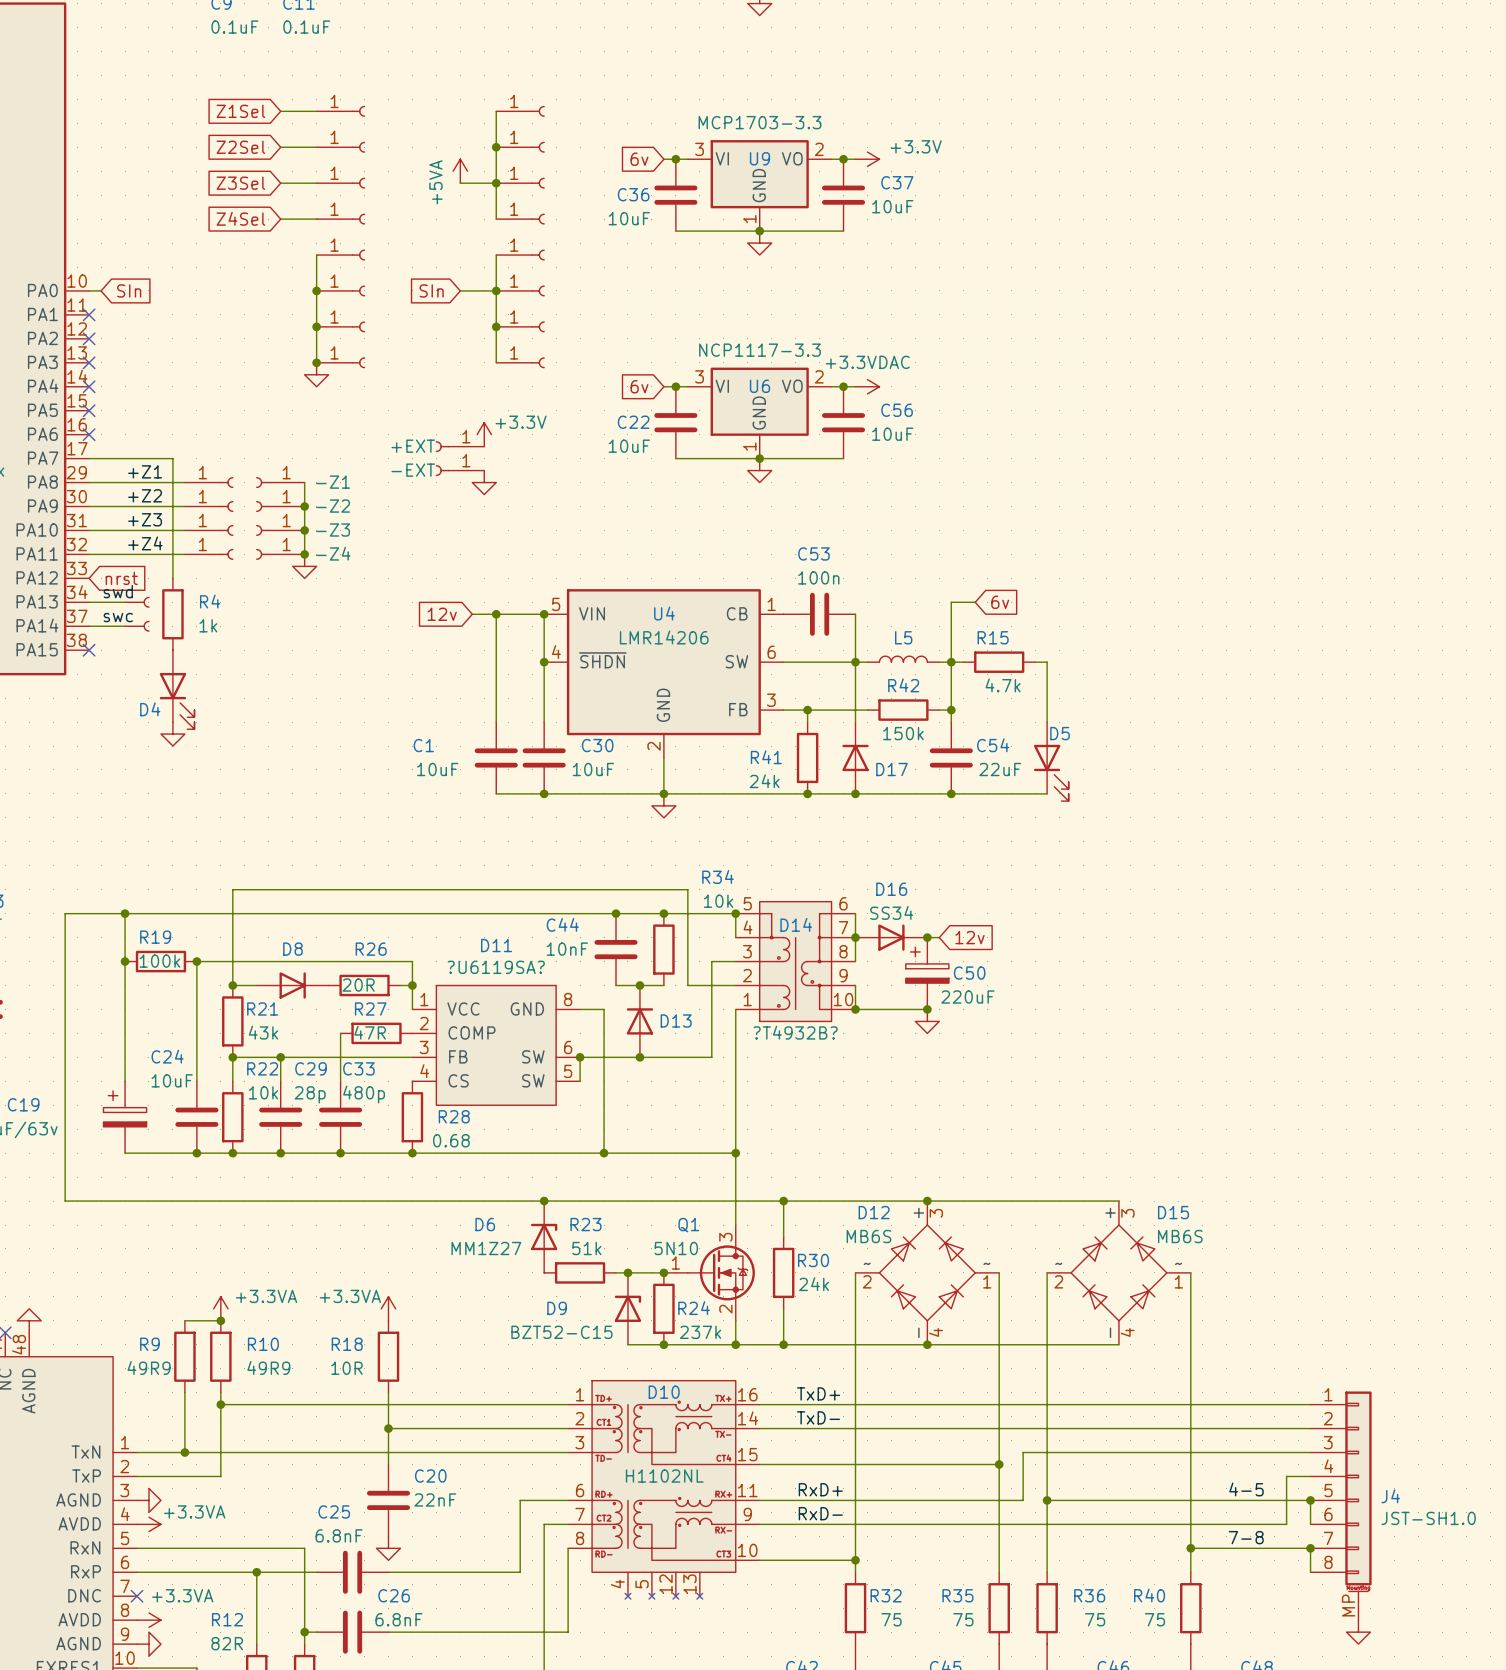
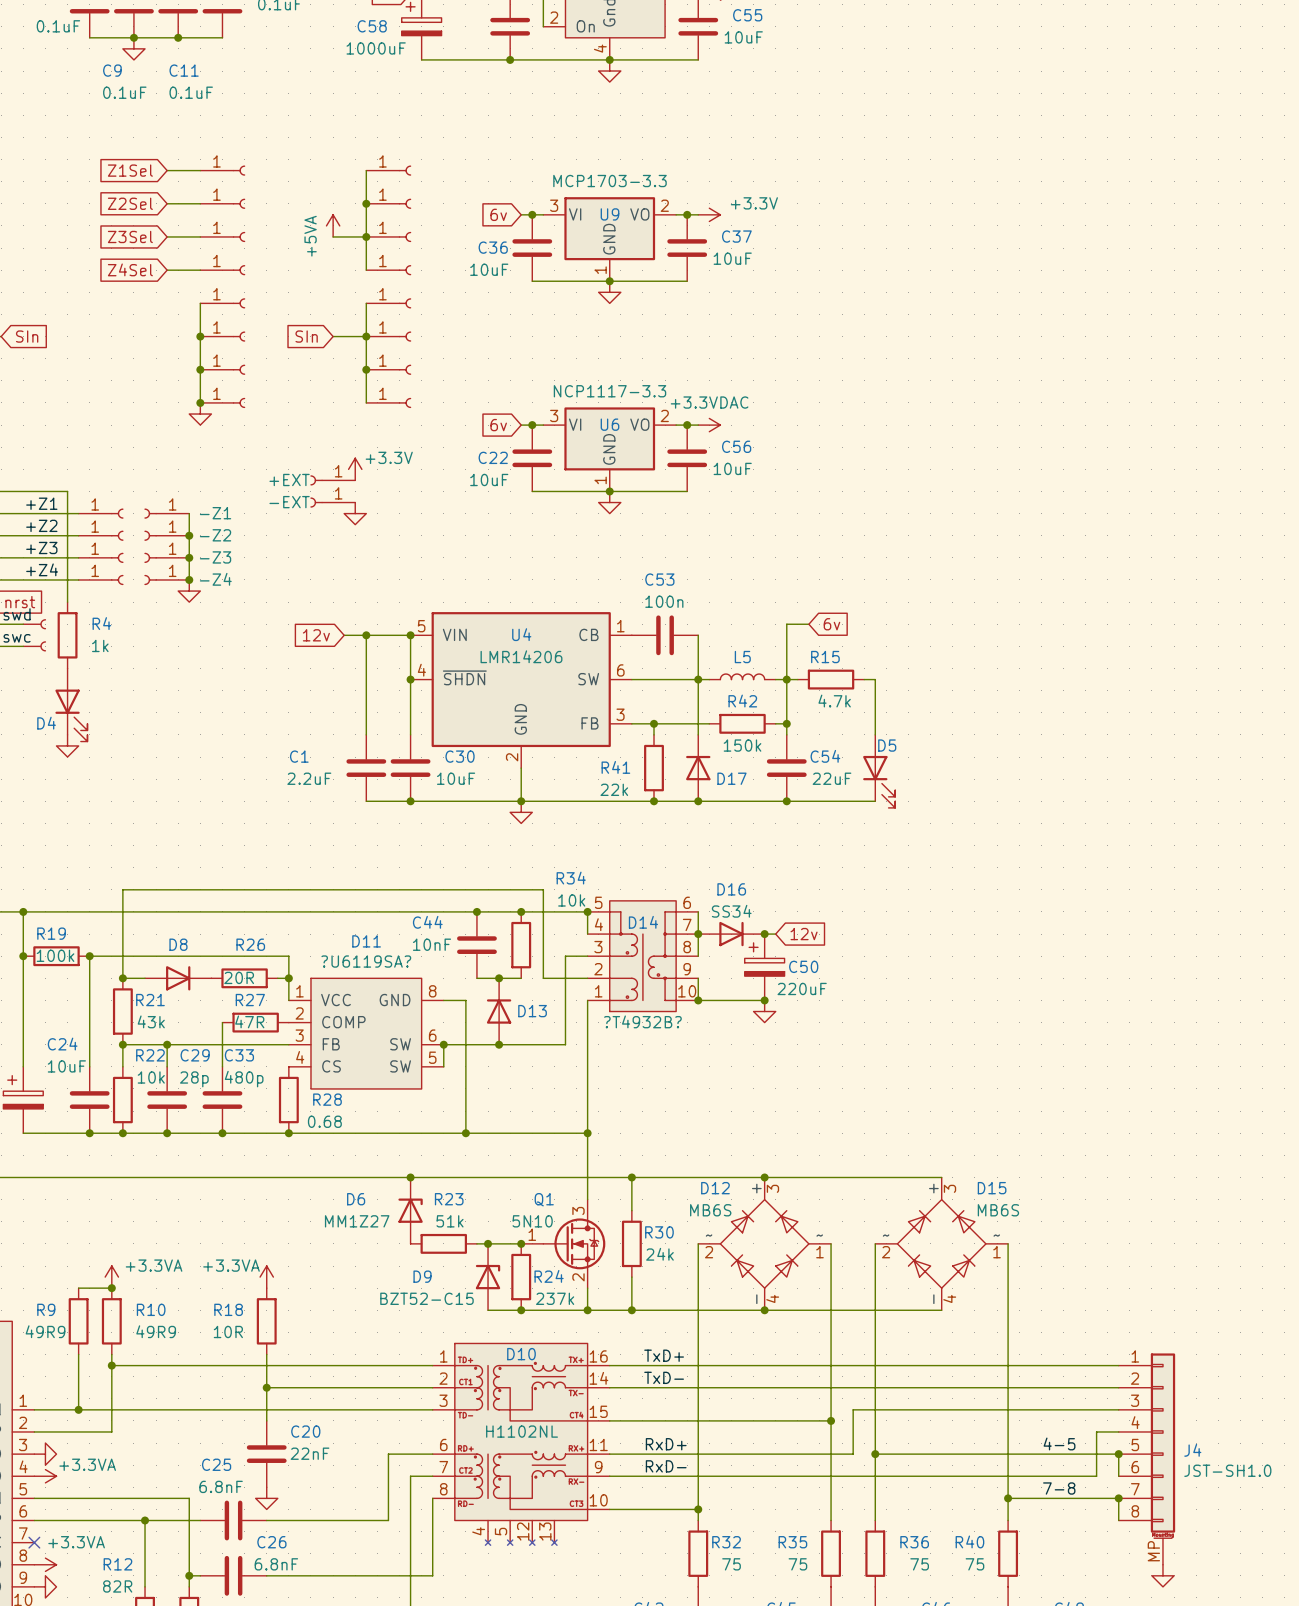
C1 value: 10uF (437, 769) -> 2.2uF (309, 778)
R41 value: 24k (764, 781) -> 22k (614, 789)

